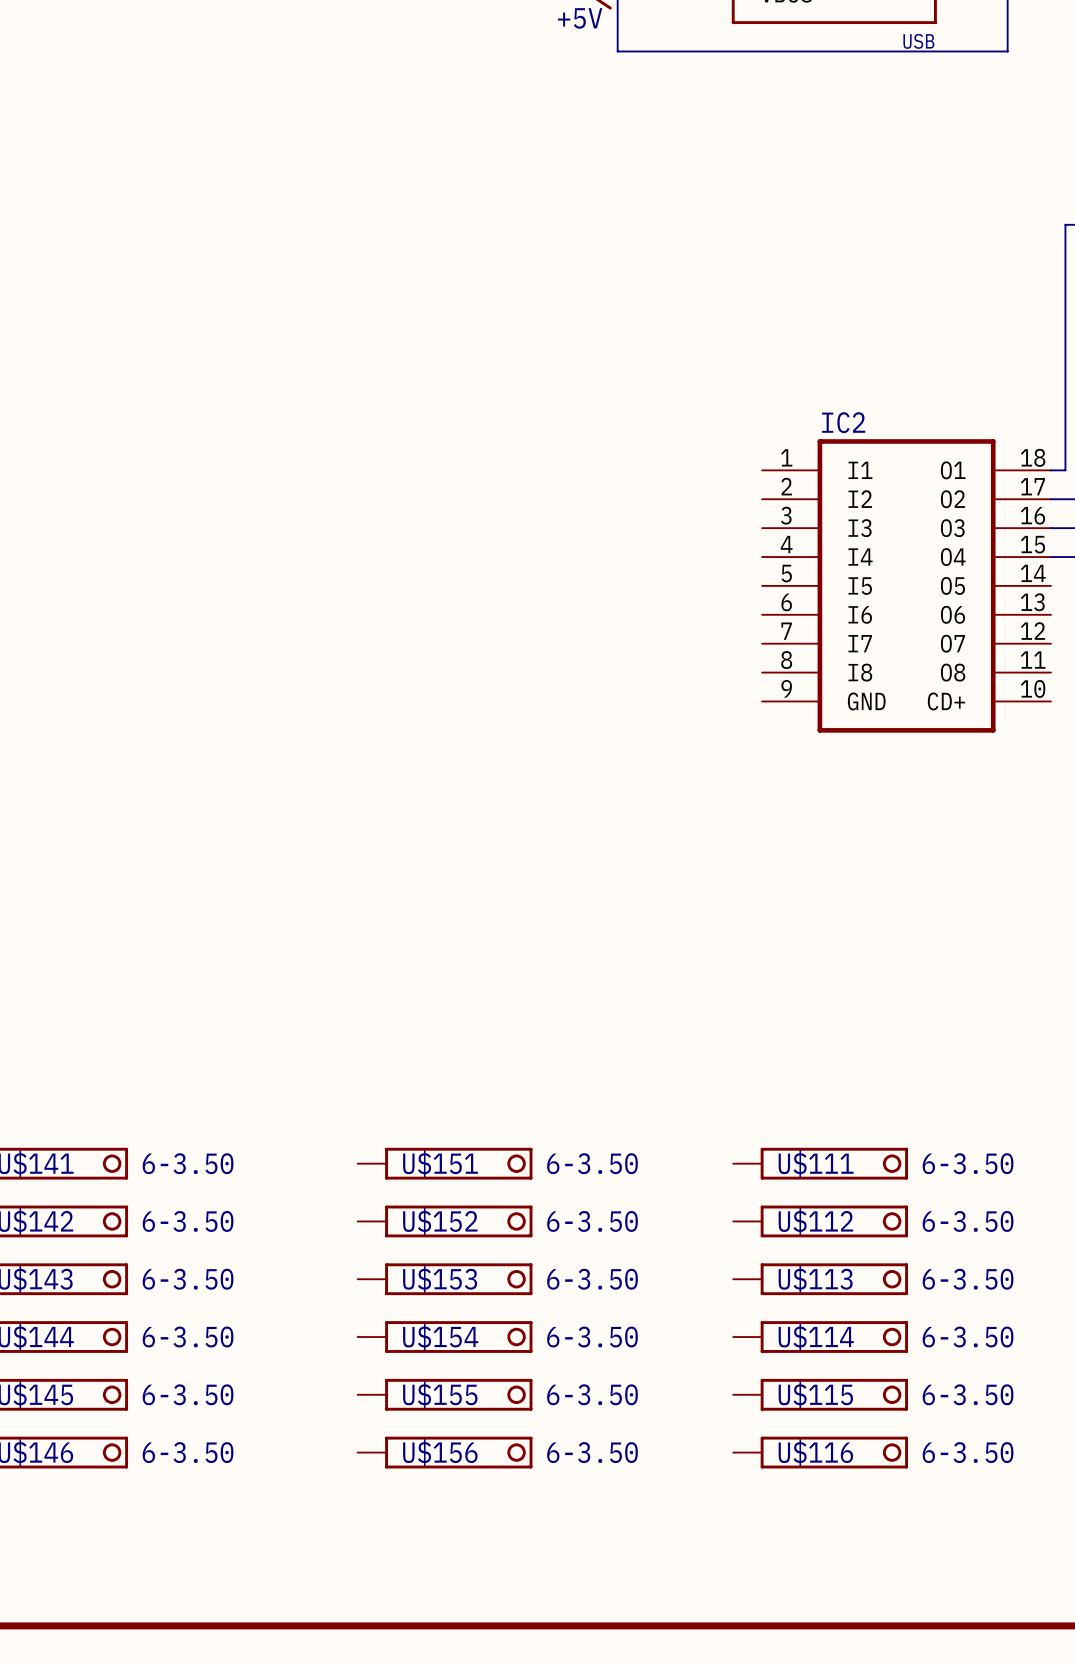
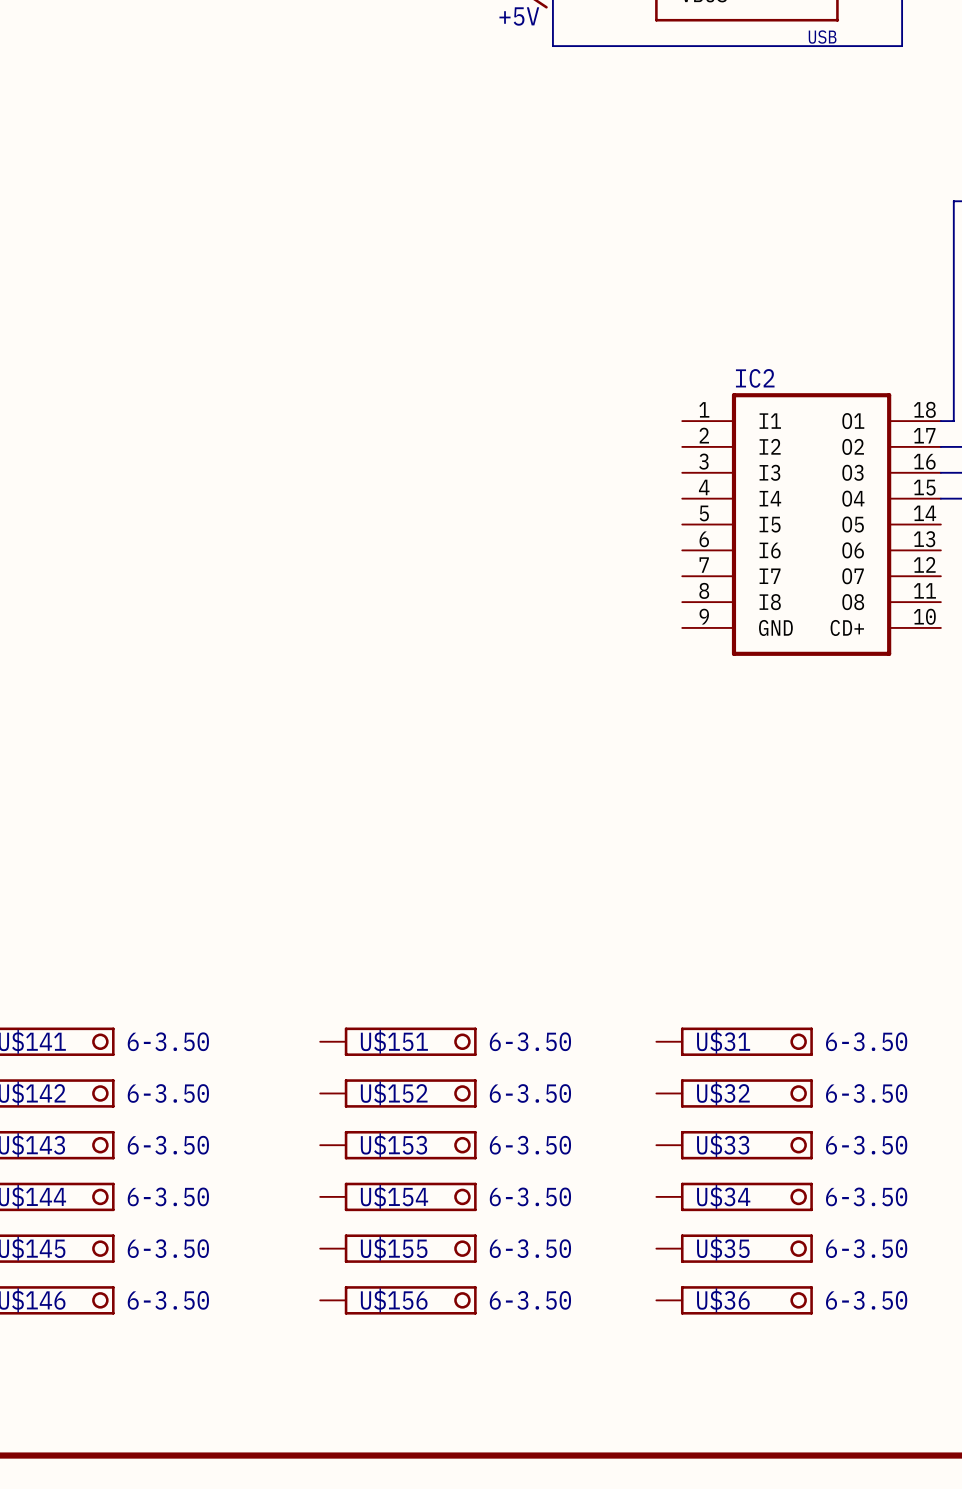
U$111 name: U$111 (816, 1163) -> U$31 (723, 1041)
U$112 name: U$112 (815, 1221) -> U$32 (723, 1093)
U$113 name: U$113 (815, 1279) -> U$33 (723, 1145)
U$114 name: U$114 (816, 1337) -> U$34 (723, 1196)
U$115 name: U$115 (815, 1394) -> U$35 (723, 1248)
U$116 name: U$116 (815, 1452) -> U$36 (723, 1300)

